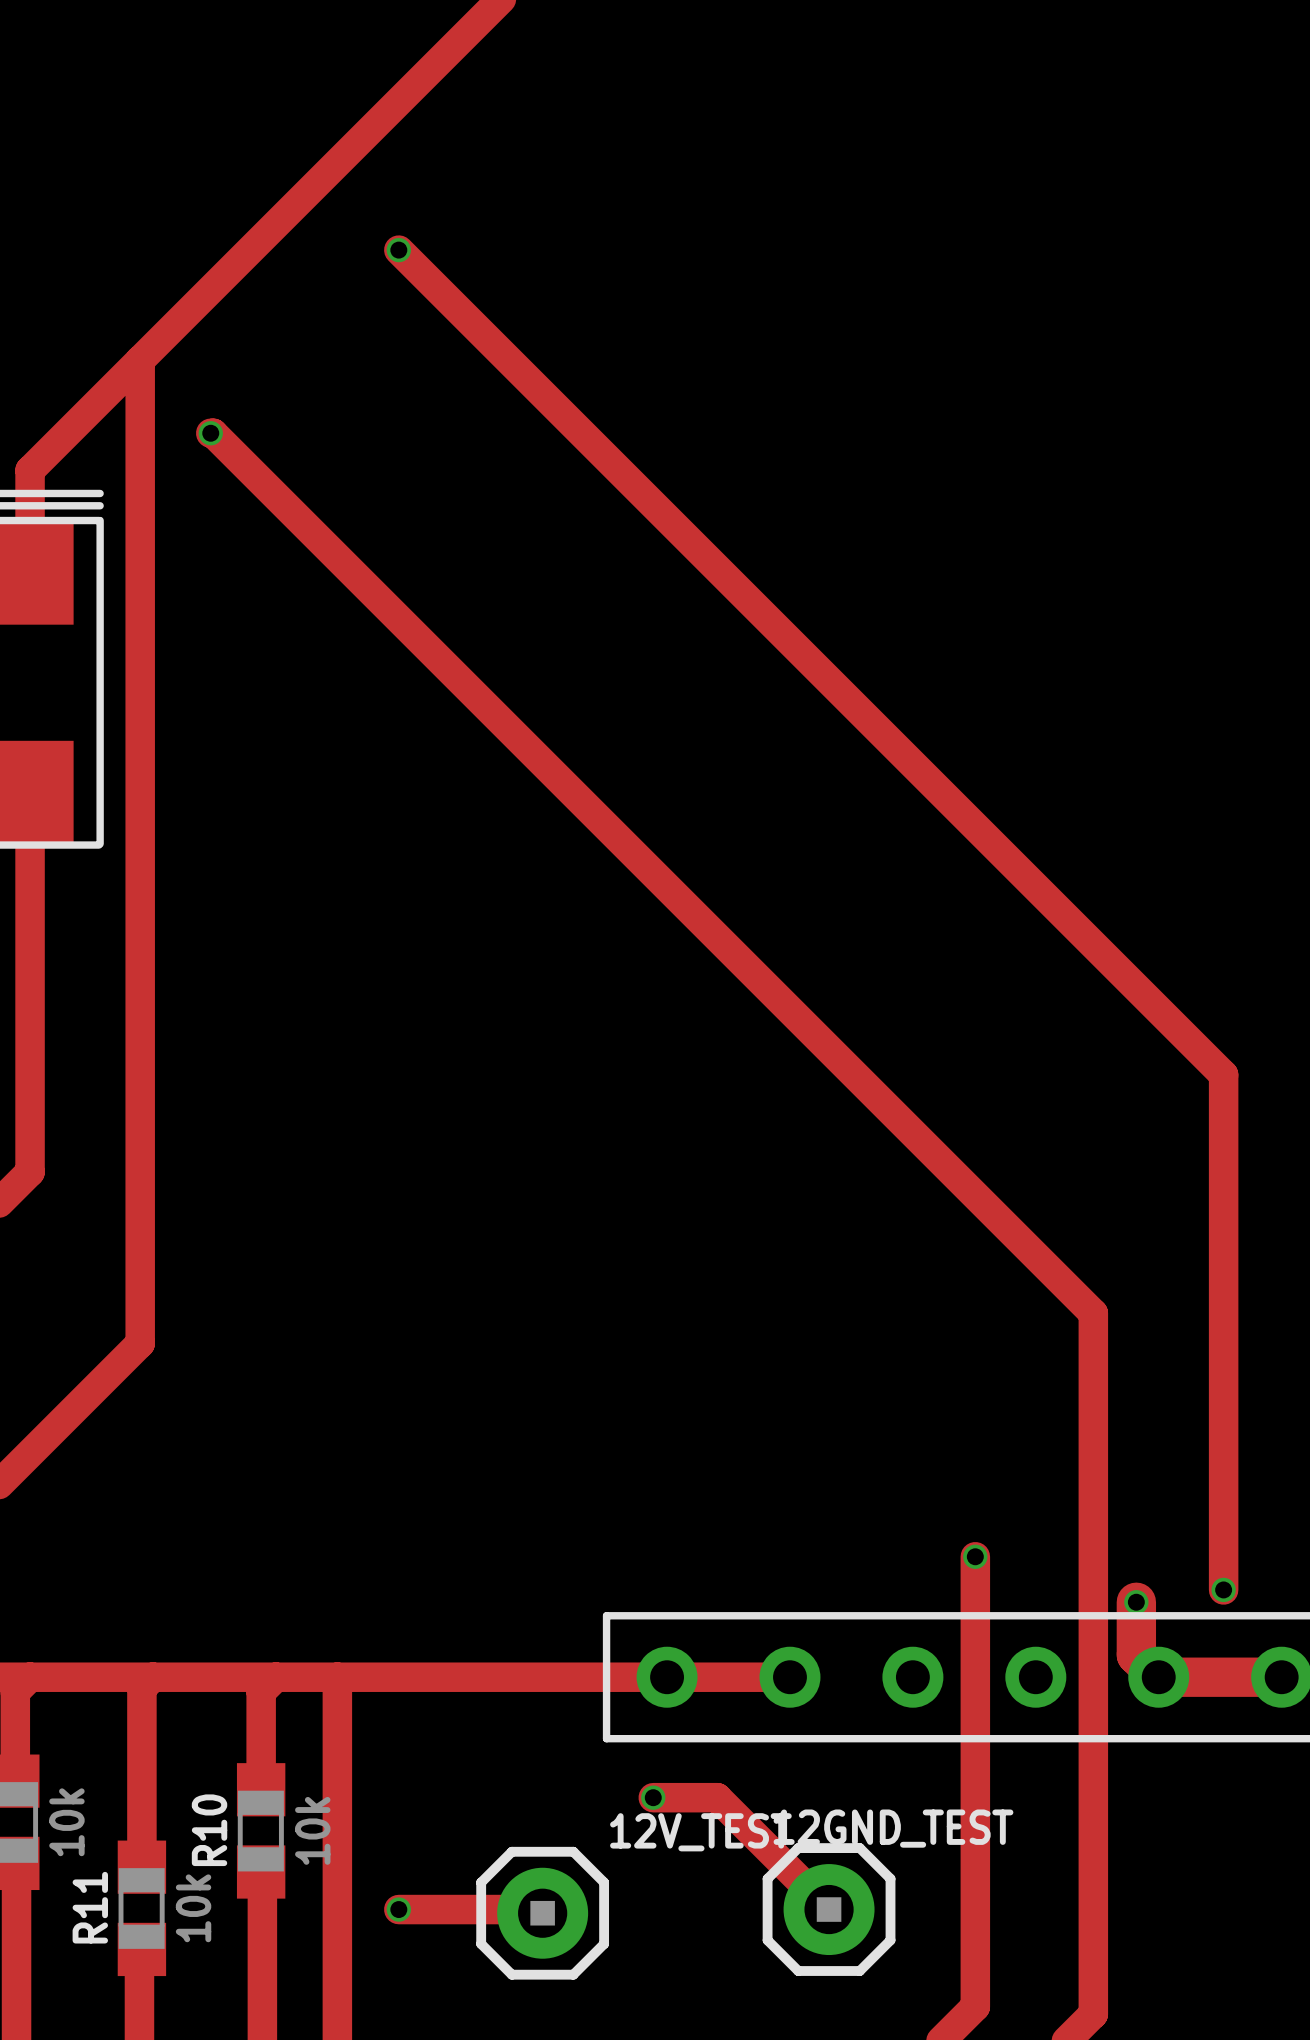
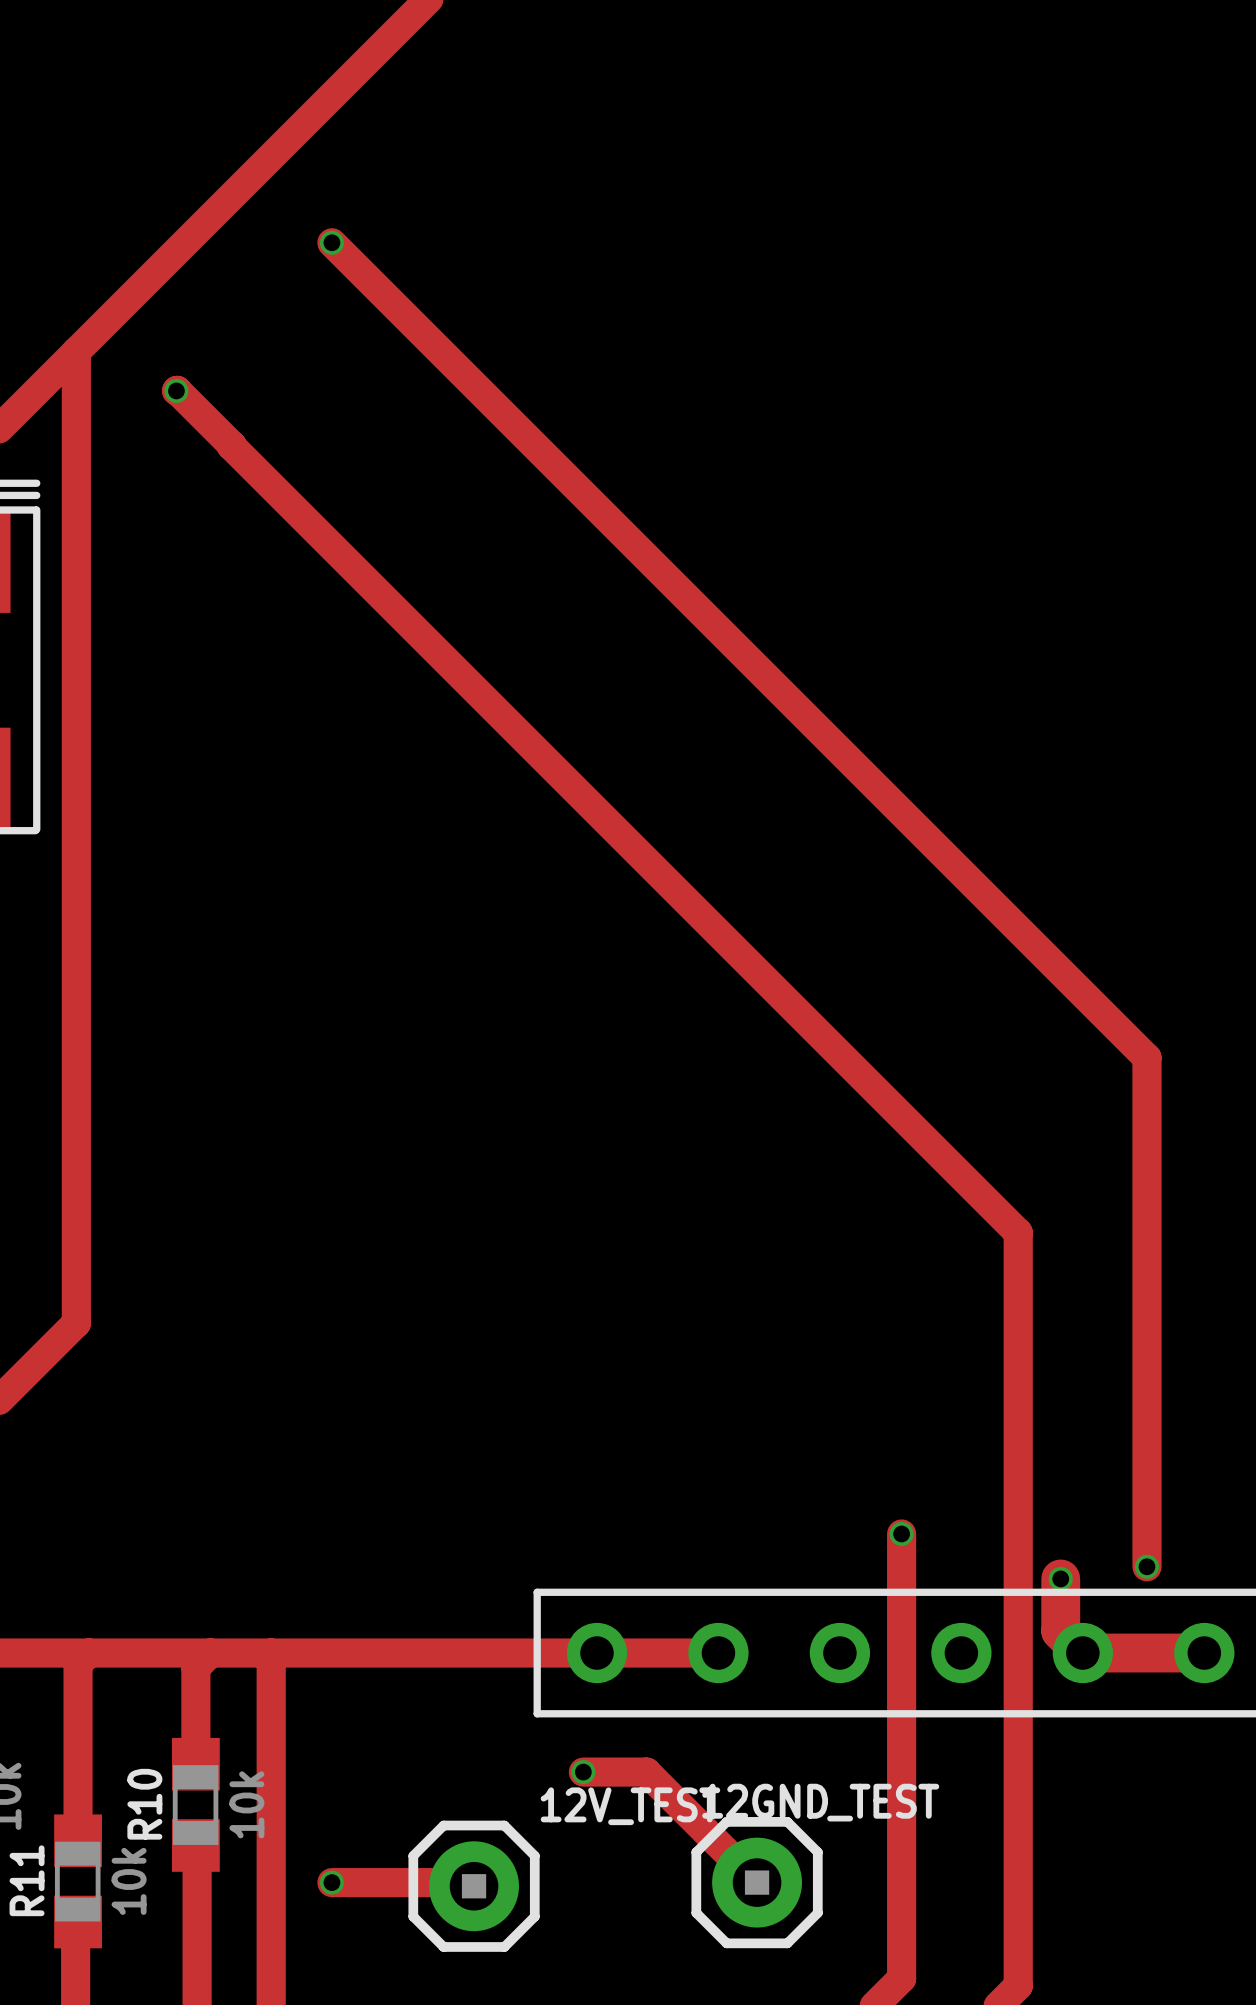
track: (210, 433) (213, 433) (1093, 1313) -> (177, 390) (1018, 1232) (1018, 1293)
via position: (210, 433) -> (176, 390)

